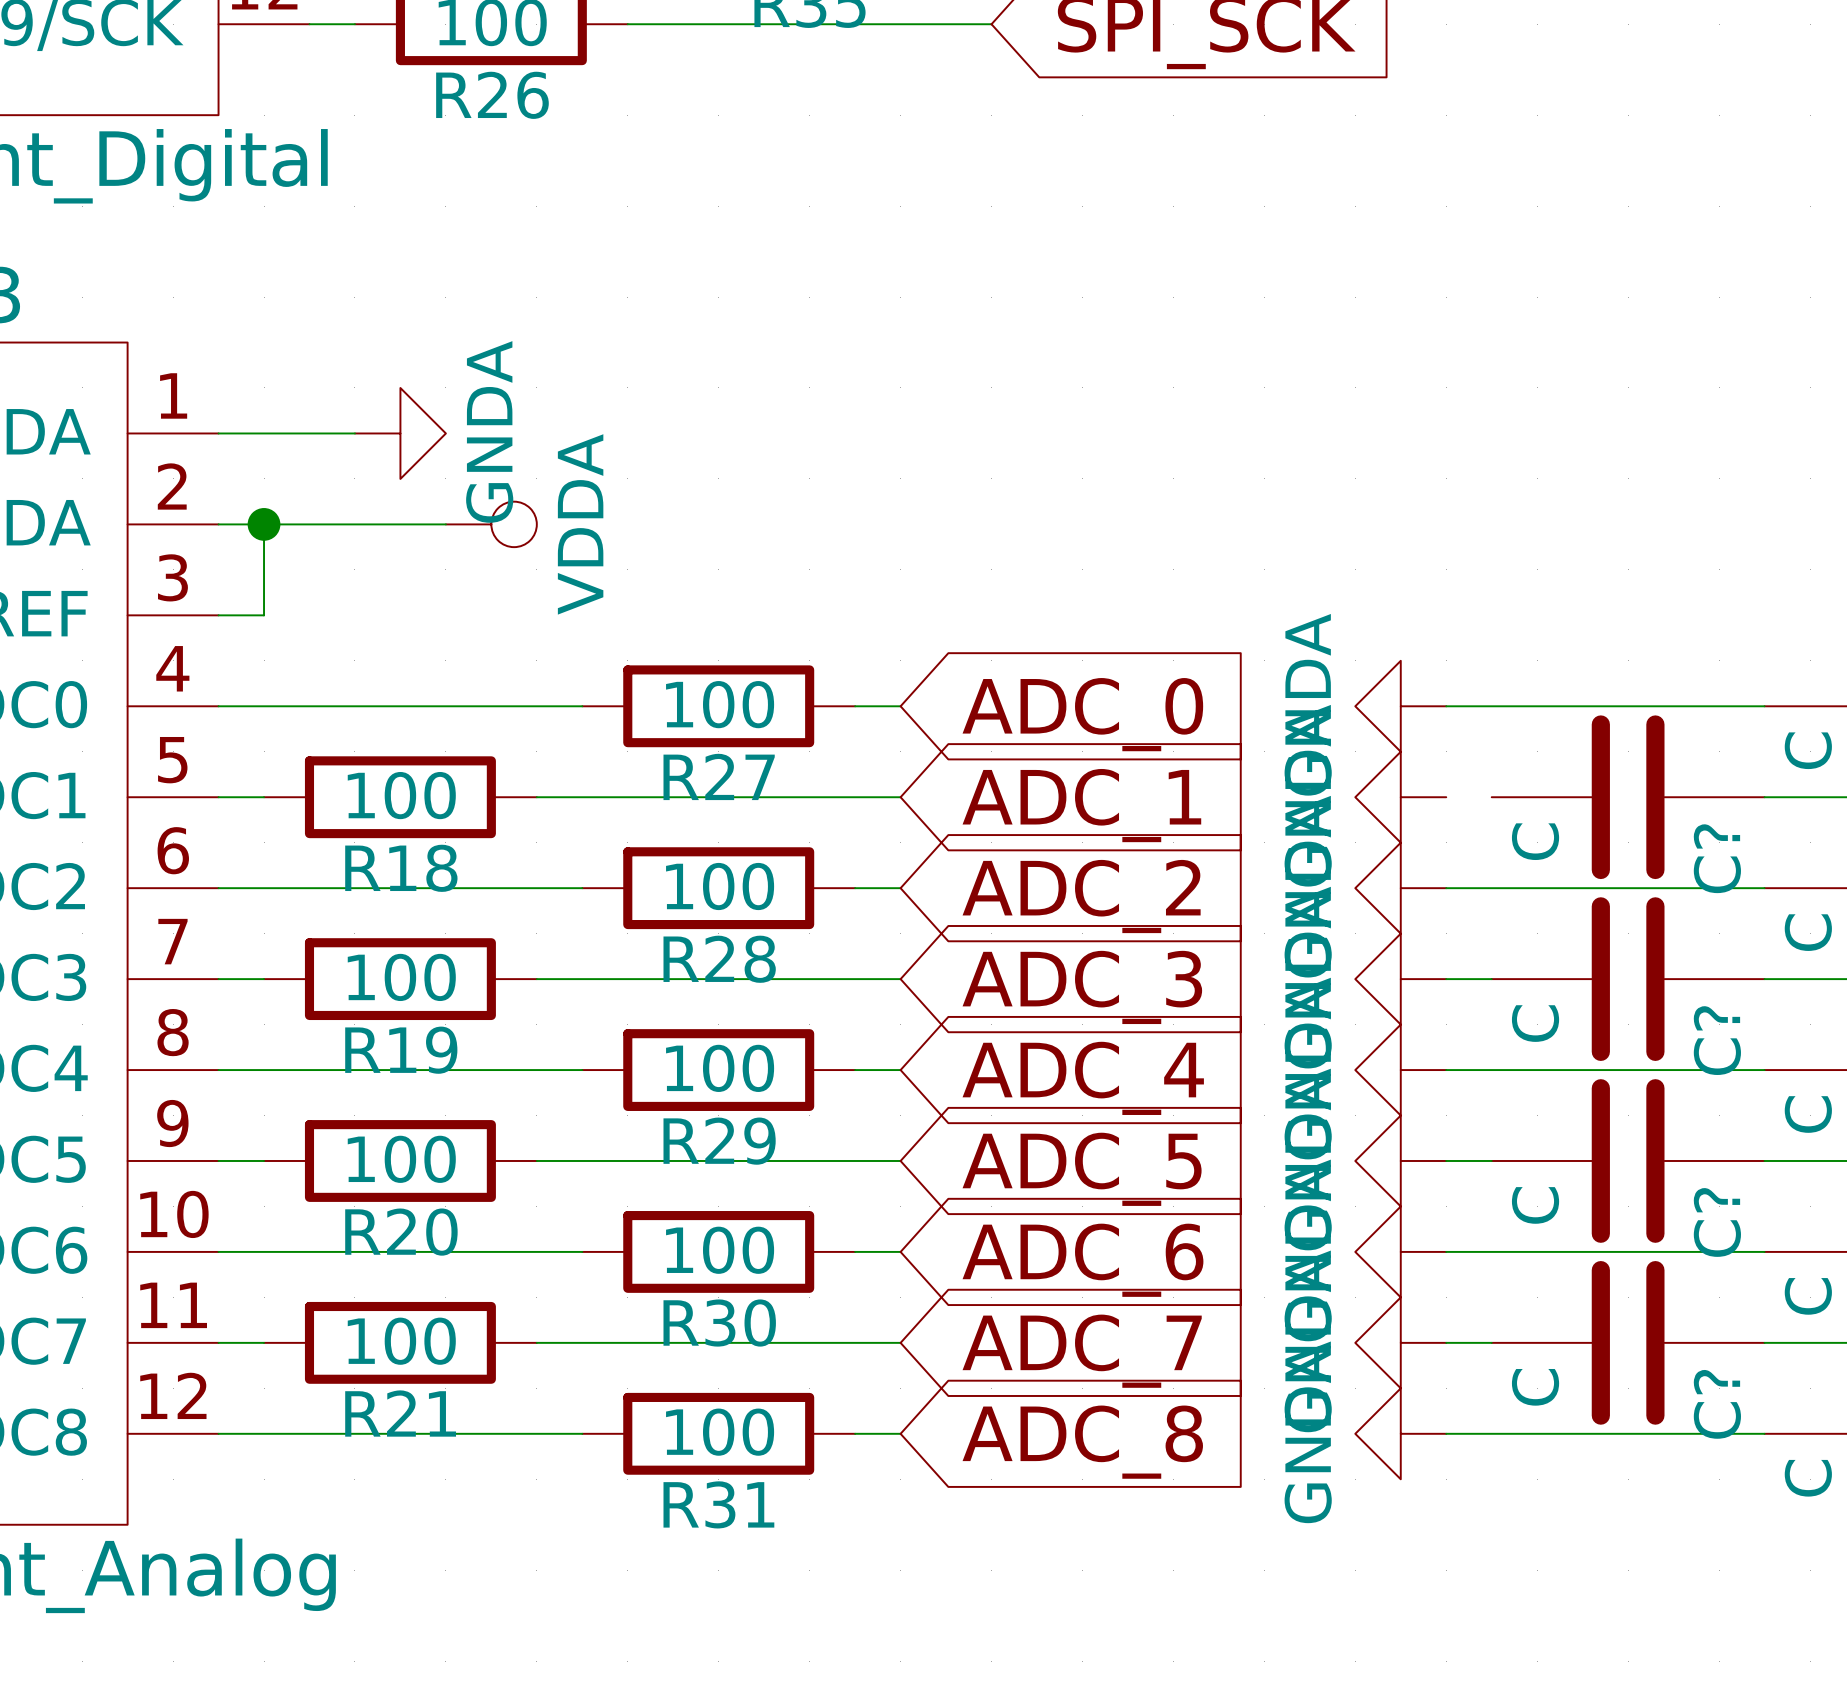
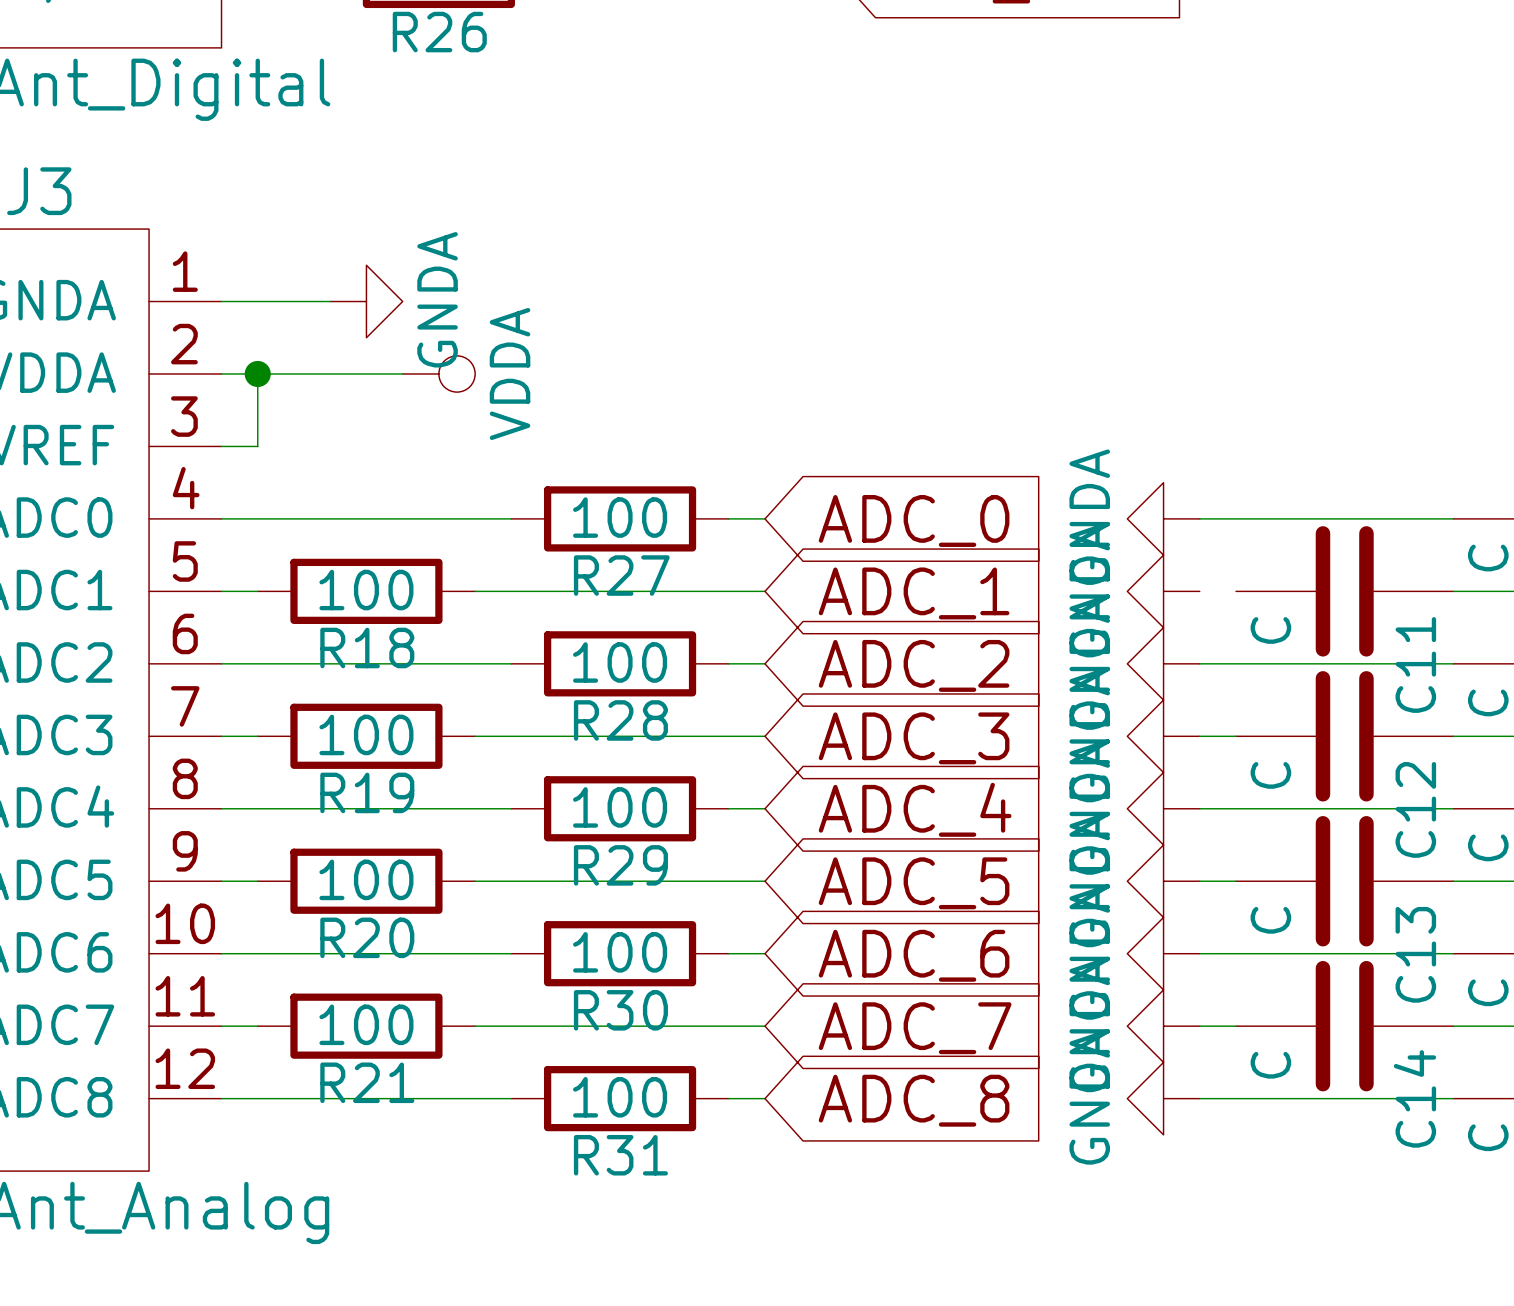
C? name: C? (1717, 858) -> C11 (1415, 664)
C? name: C? (1717, 1040) -> C12 (1415, 809)
C? name: C? (1717, 1222) -> C13 (1415, 954)
C? name: C? (1717, 1404) -> C14 (1414, 1098)

